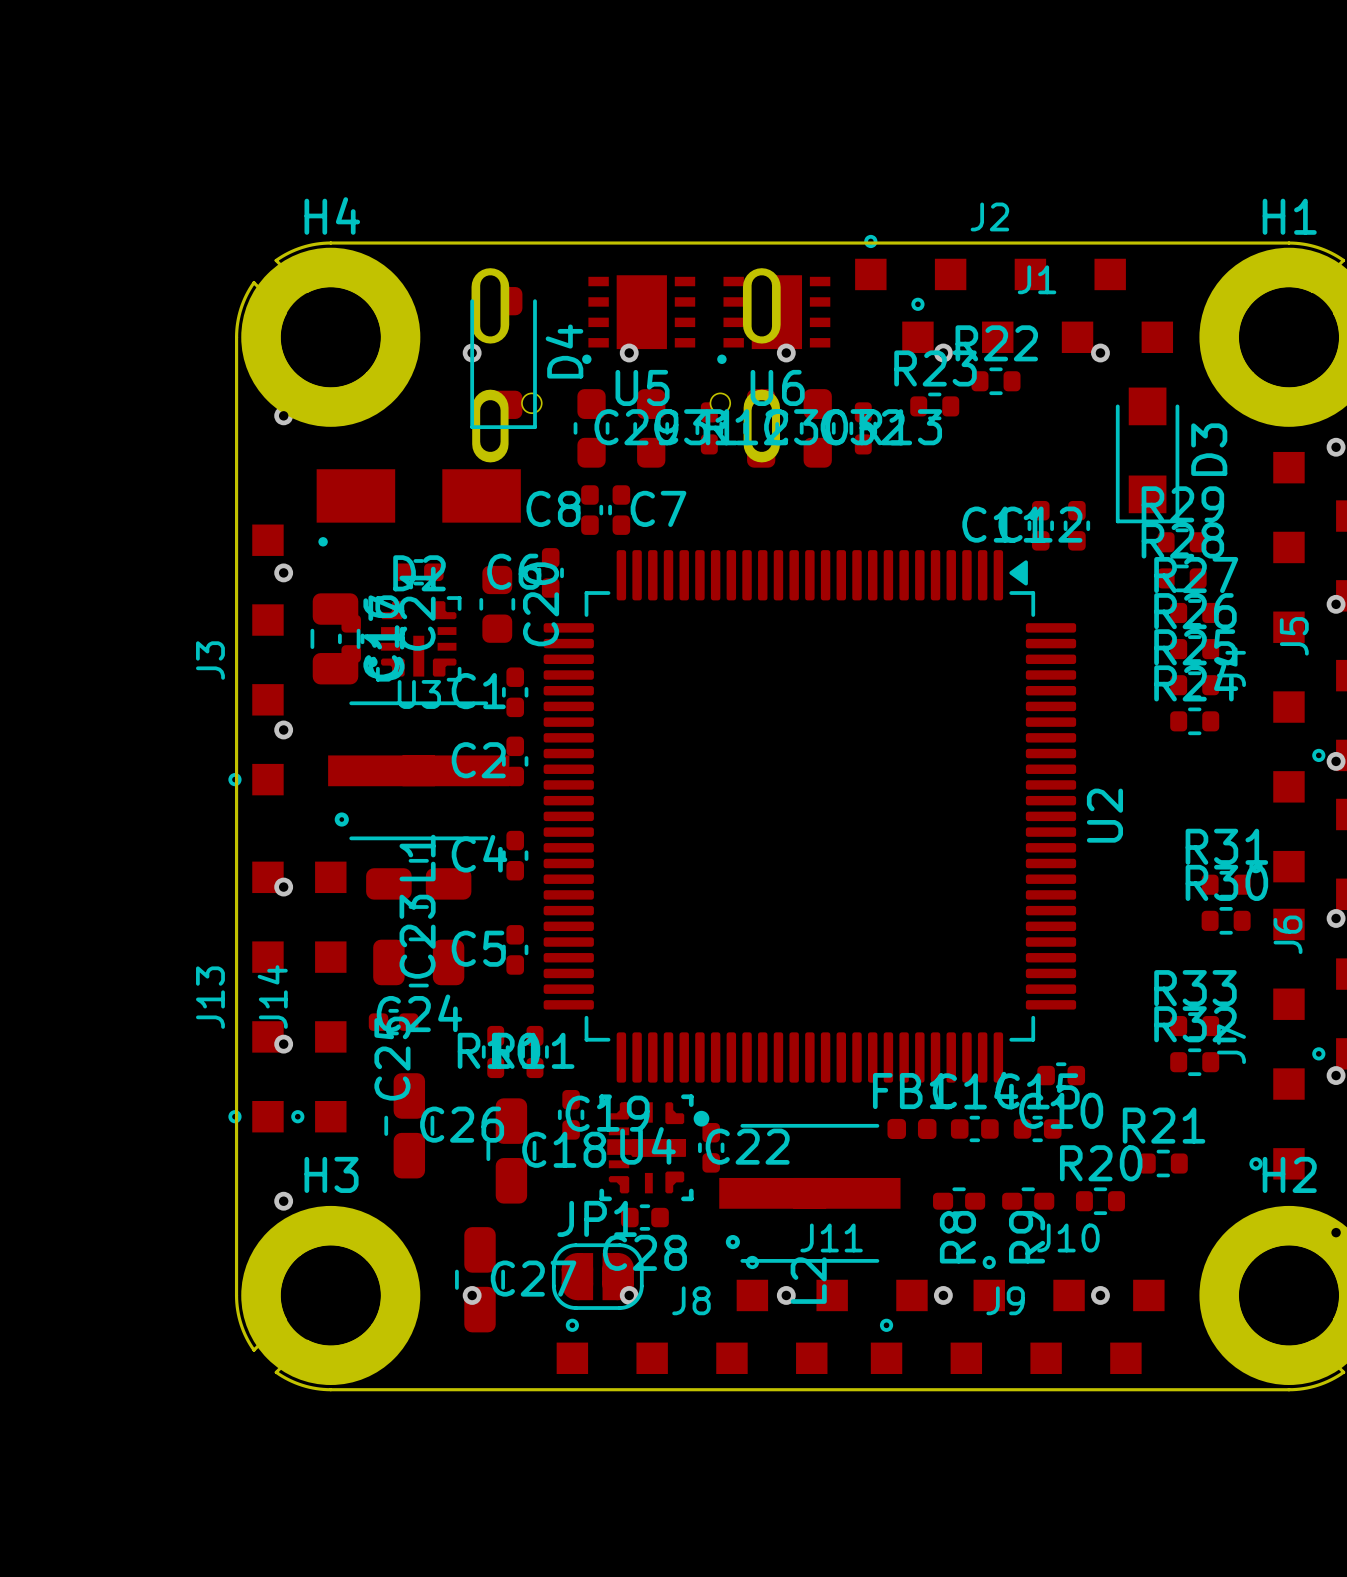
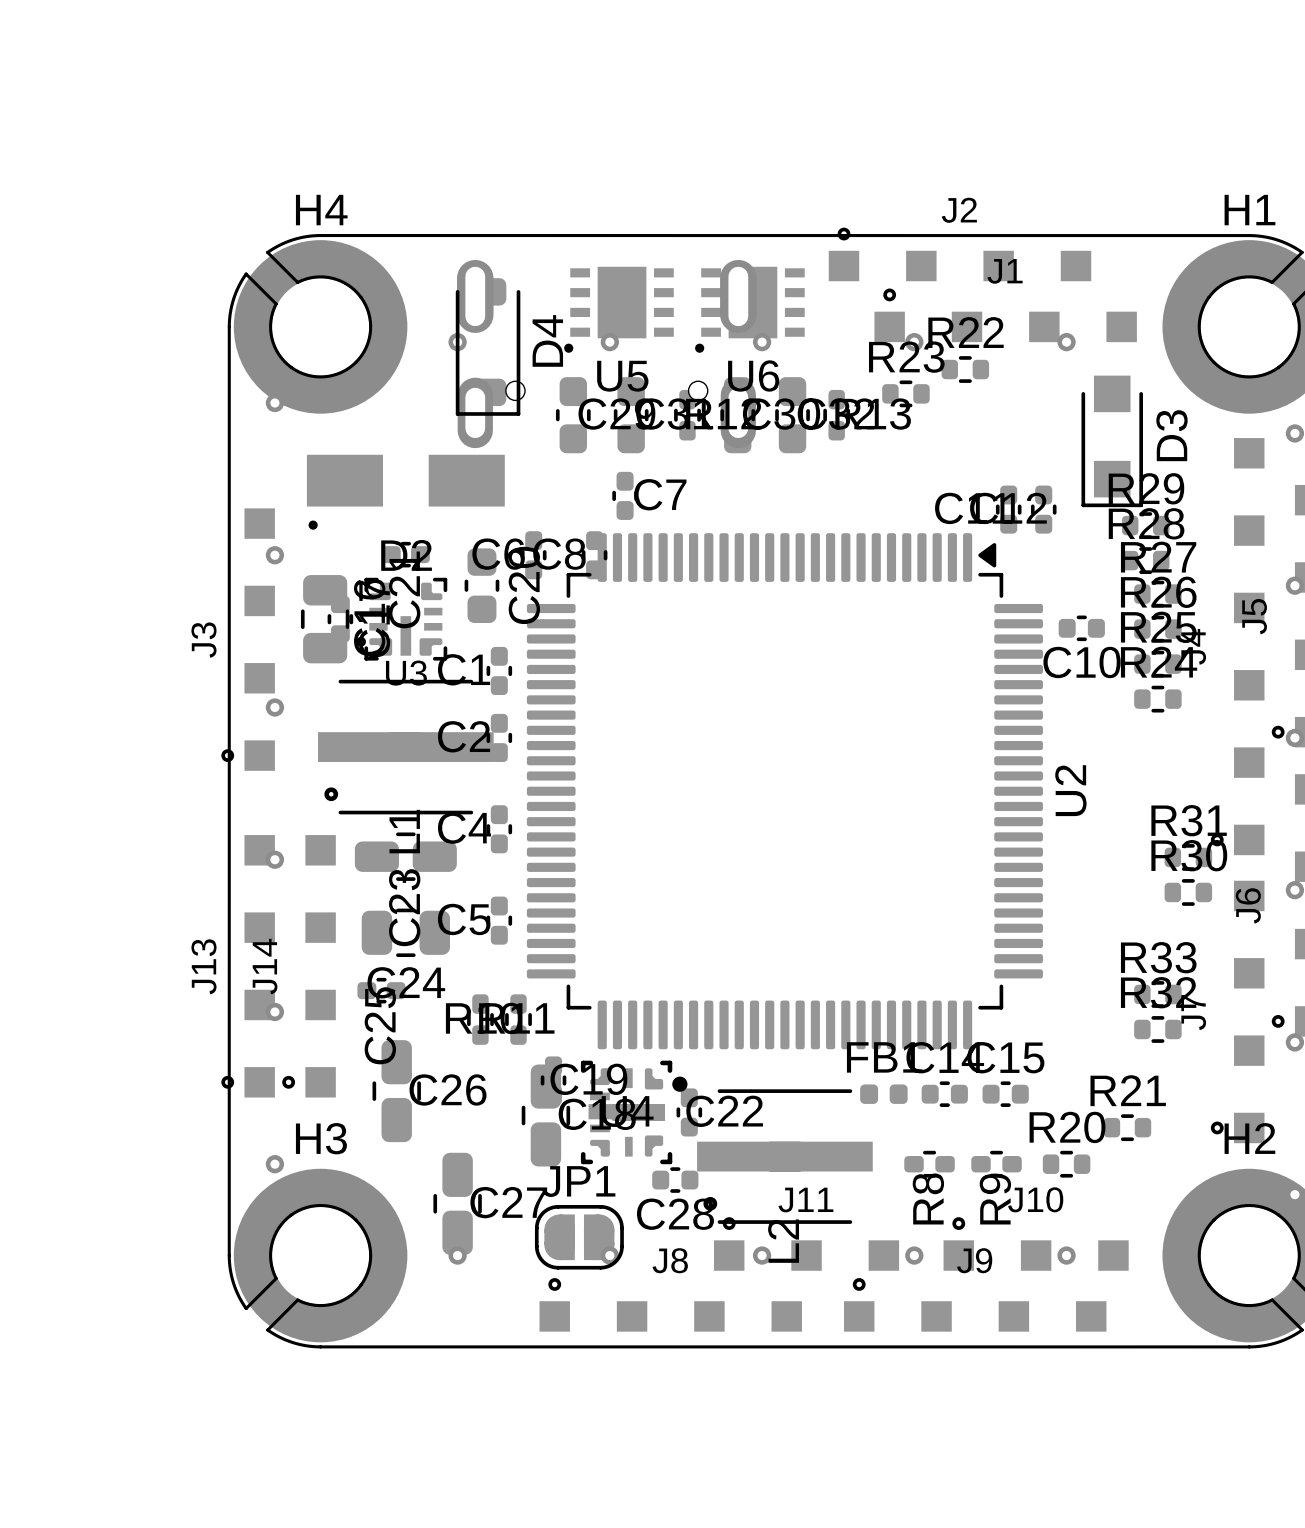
C8 position: (589, 510) -> (594, 555)
C7 position: (621, 510) -> (625, 495)
C10 position: (1061, 1075) -> (1081, 628)
C18 position: (511, 1150) -> (545, 1115)
C28 position: (644, 1217) -> (675, 1180)
C27 position: (480, 1279) -> (457, 1203)

